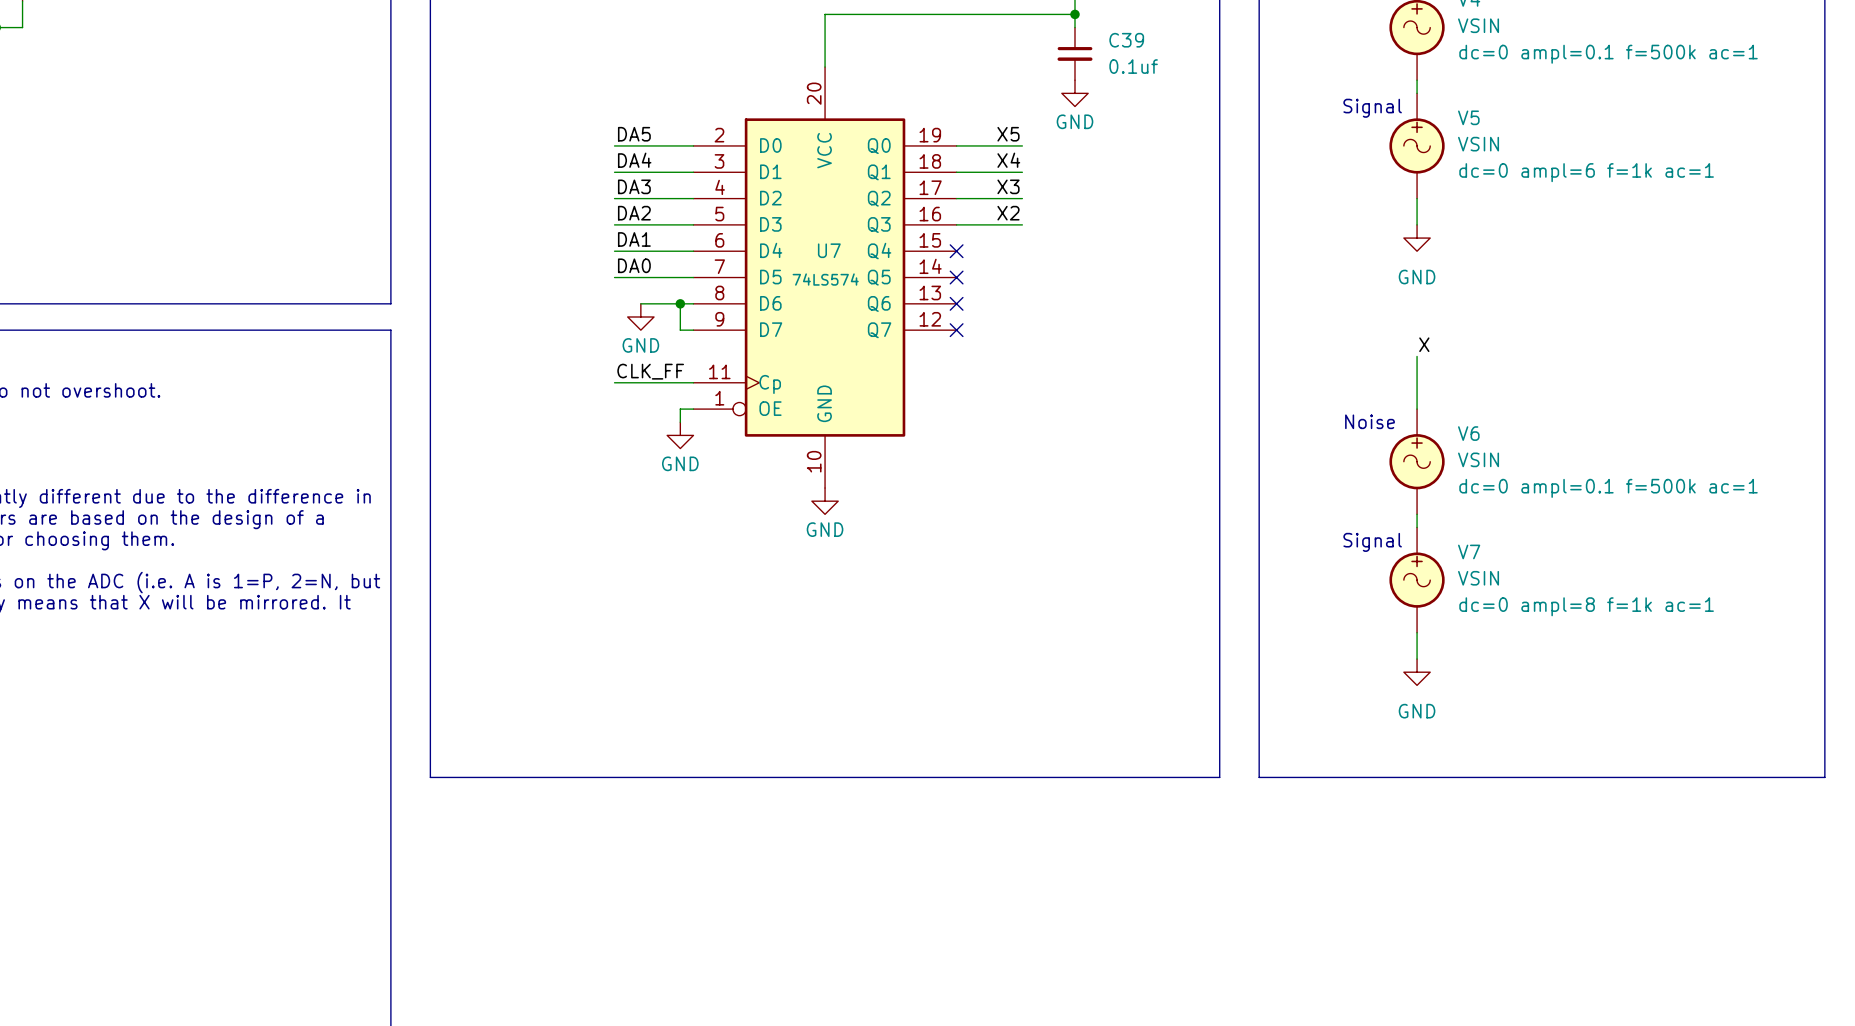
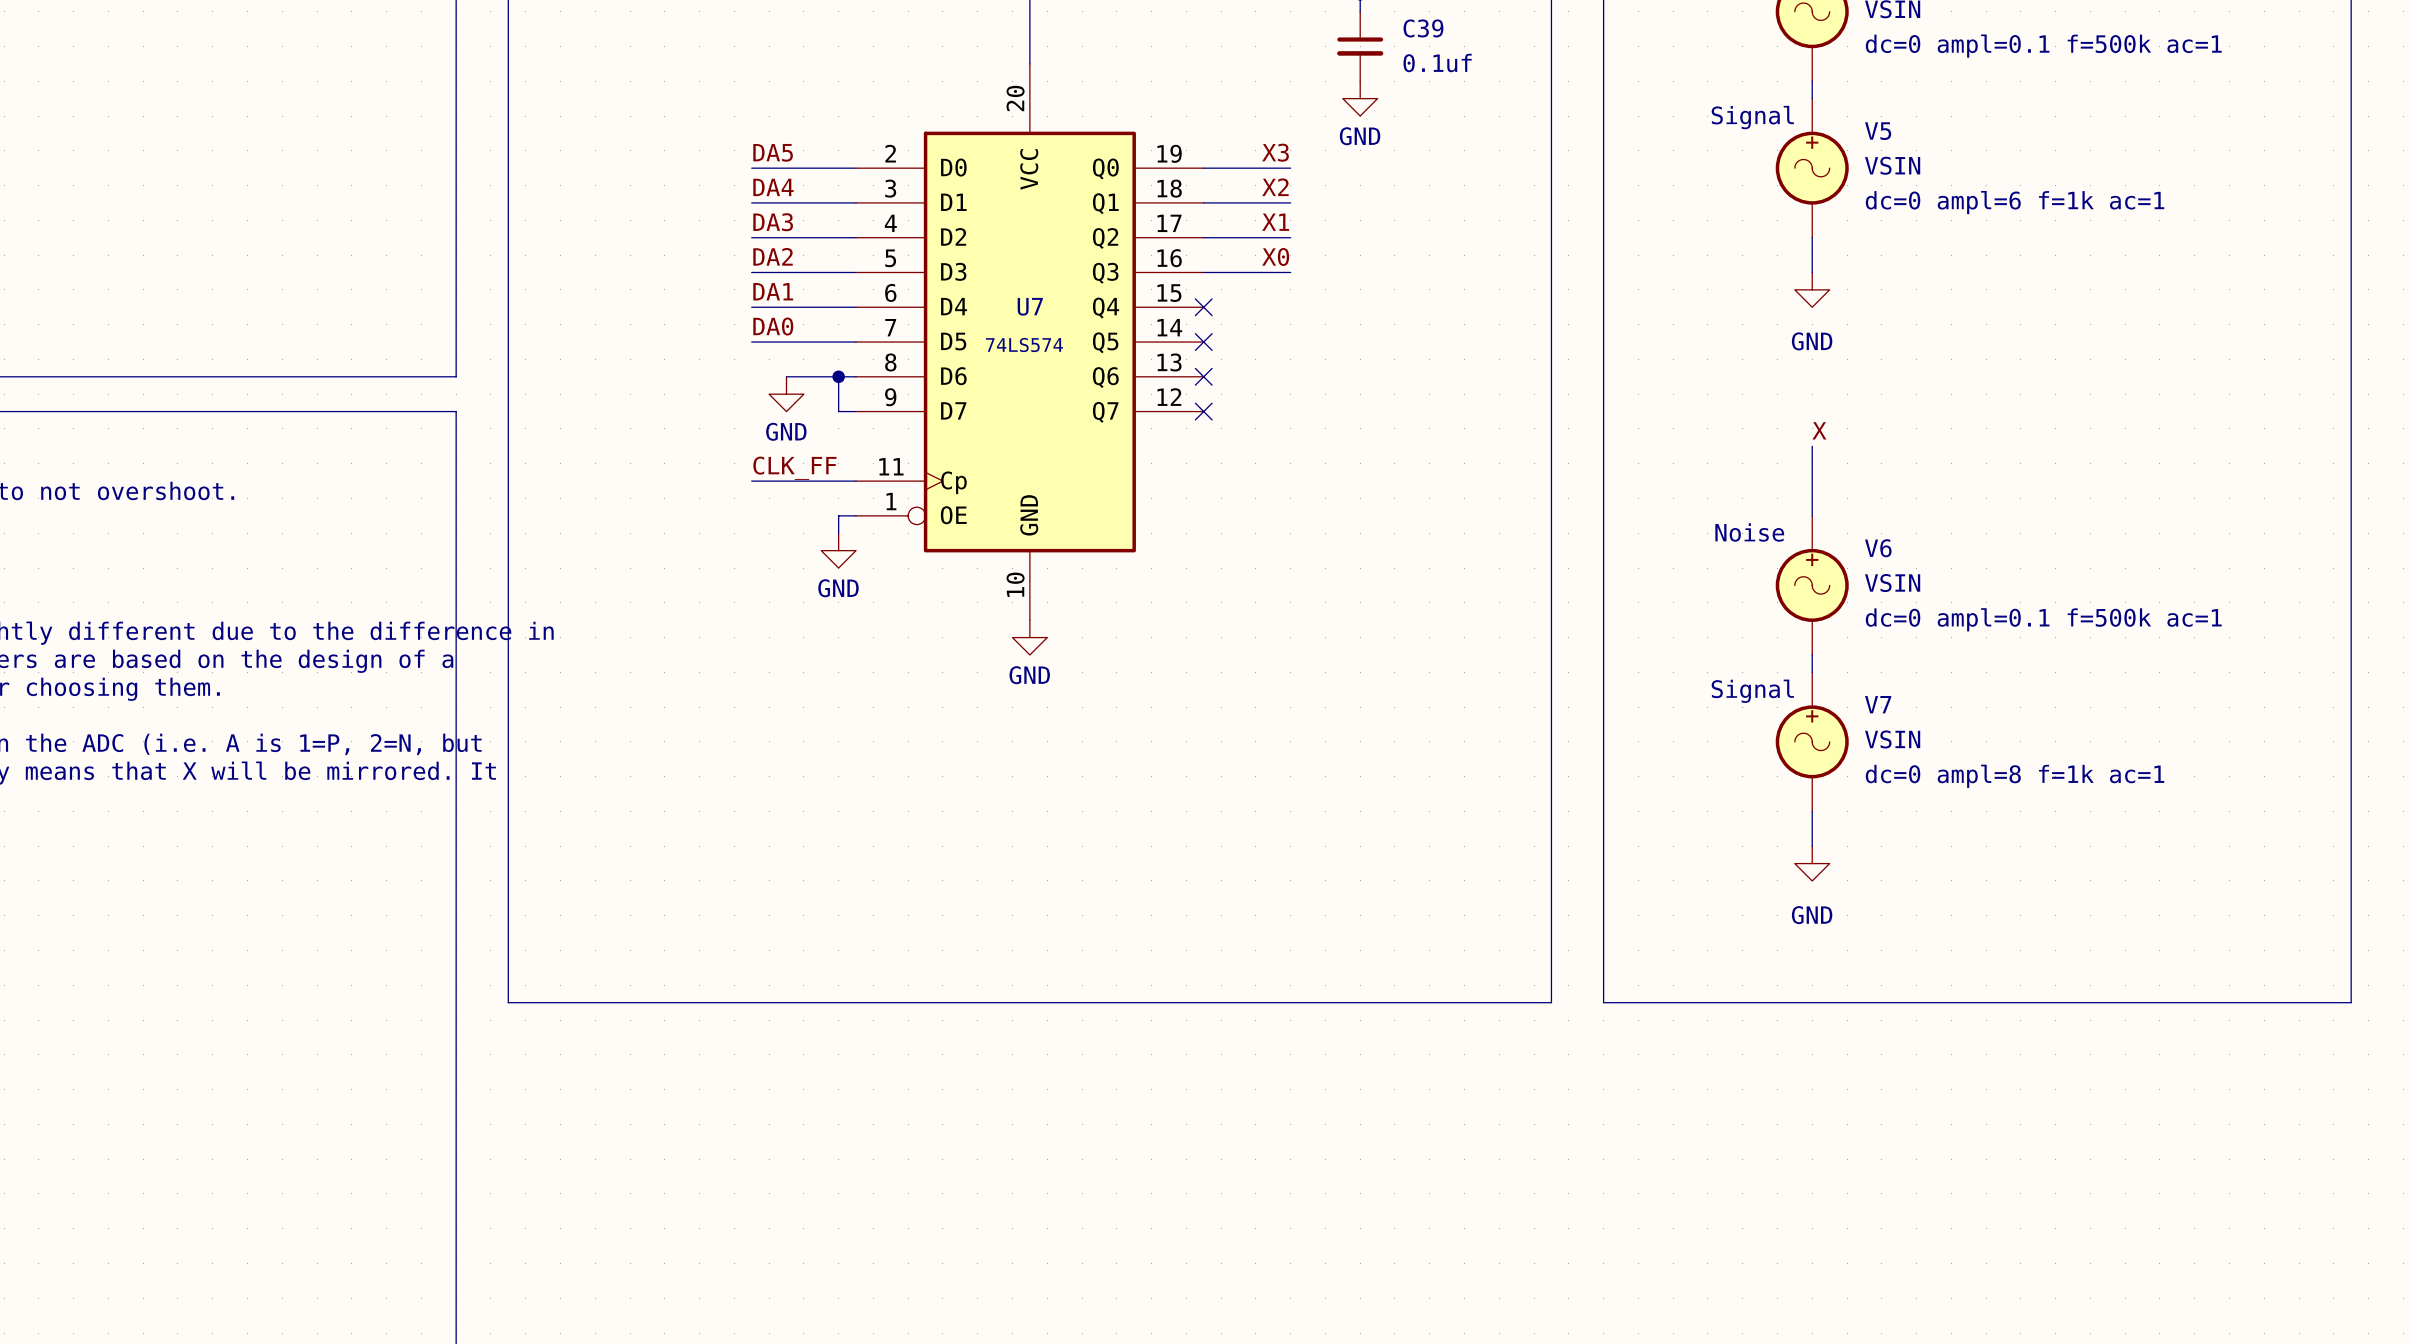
label: X5 (1008, 134) -> X3 (1275, 152)
label: X4 (1008, 160) -> X2 (1275, 187)
label: X3 (1008, 186) -> X1 (1275, 222)
label: X2 (1008, 213) -> X0 (1275, 256)

